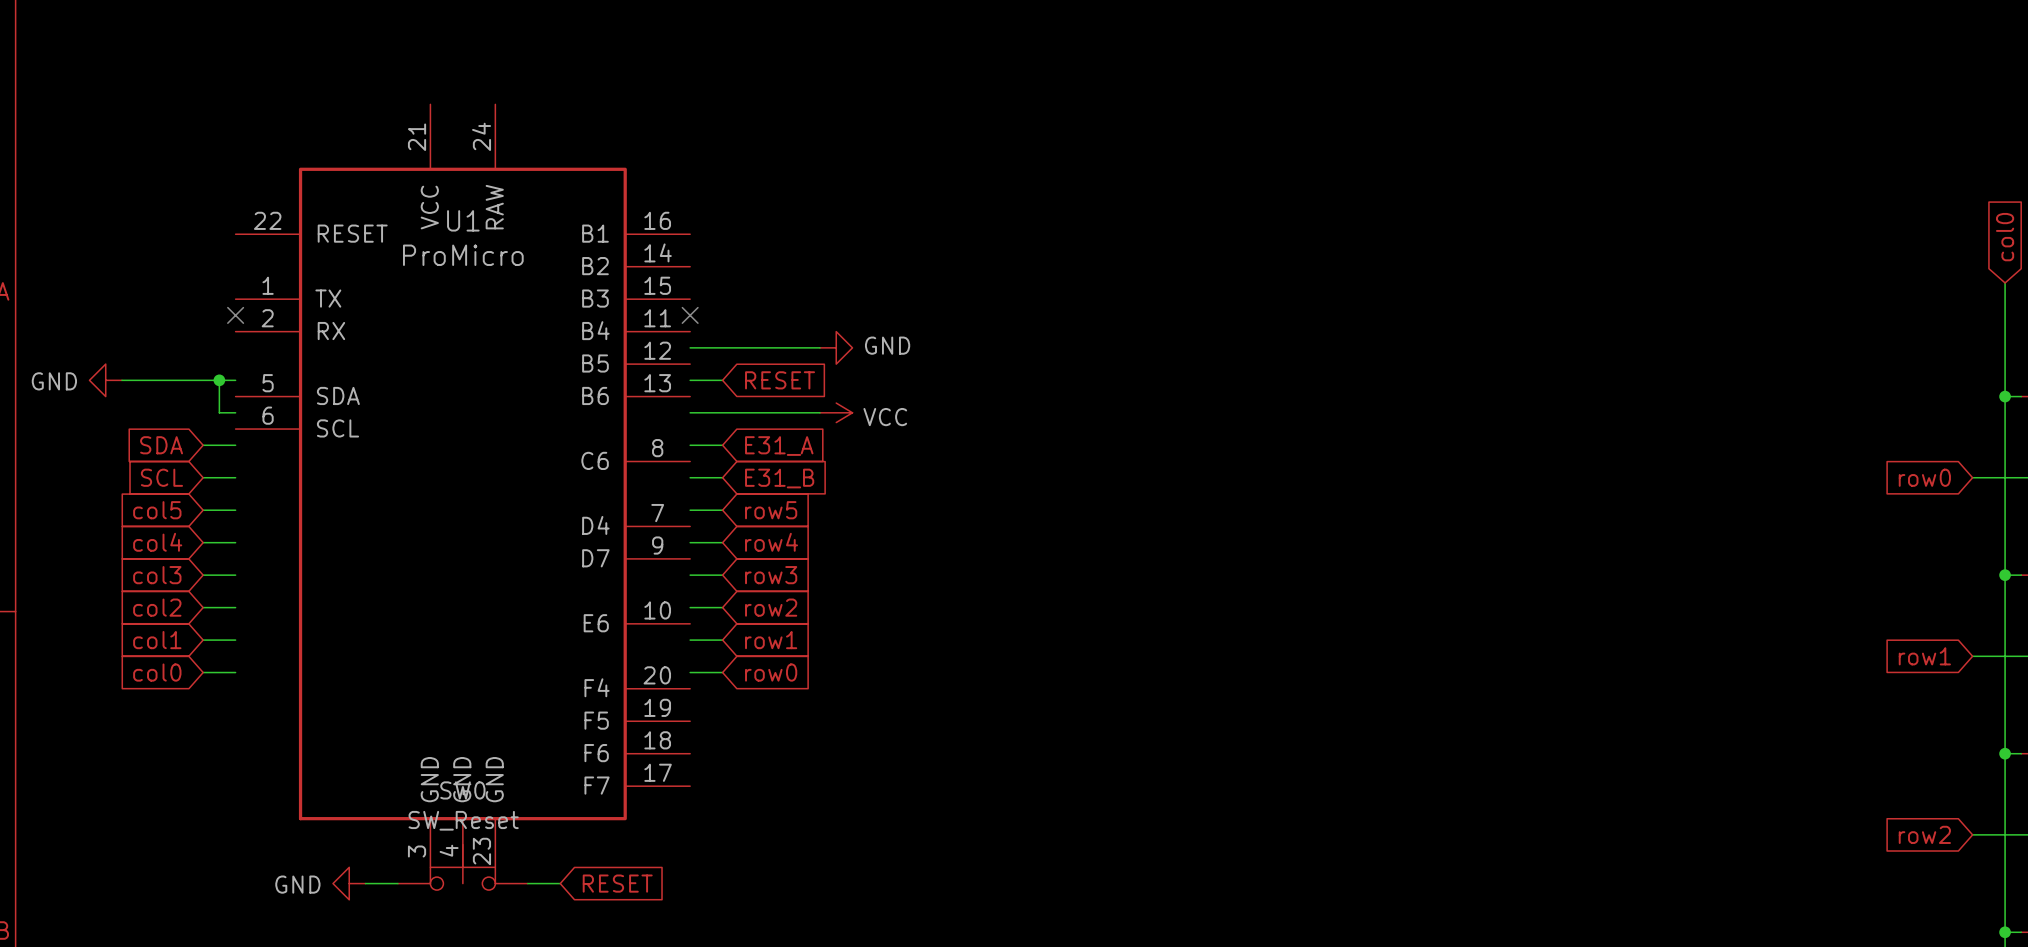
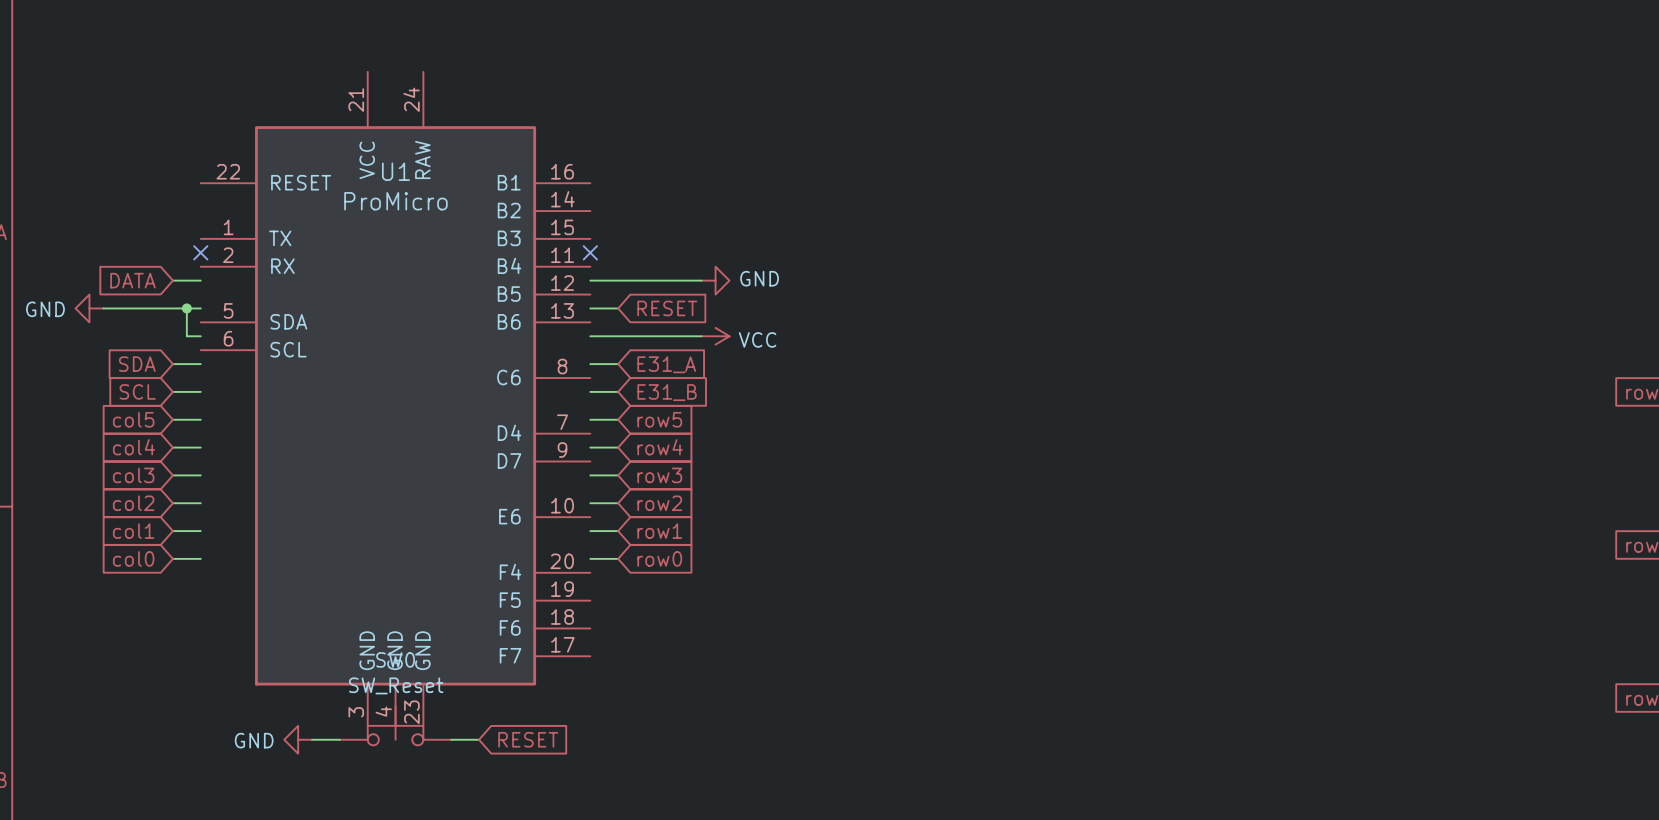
global label: none -> DATA (133, 280)
wire: none -> (172, 280) (200, 280)

